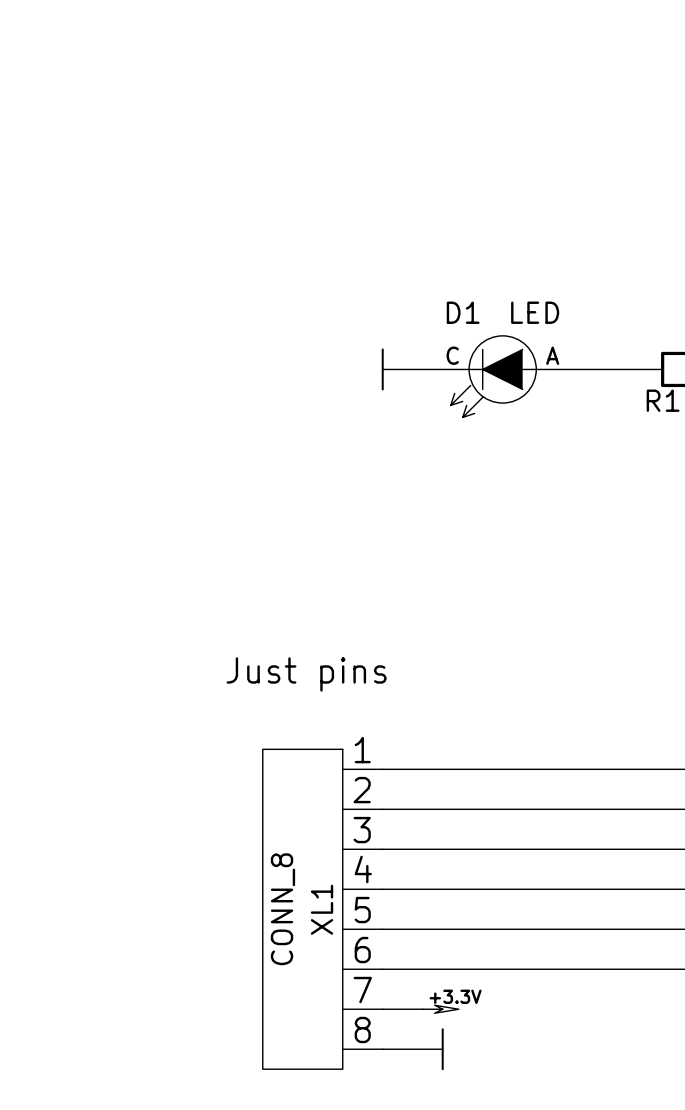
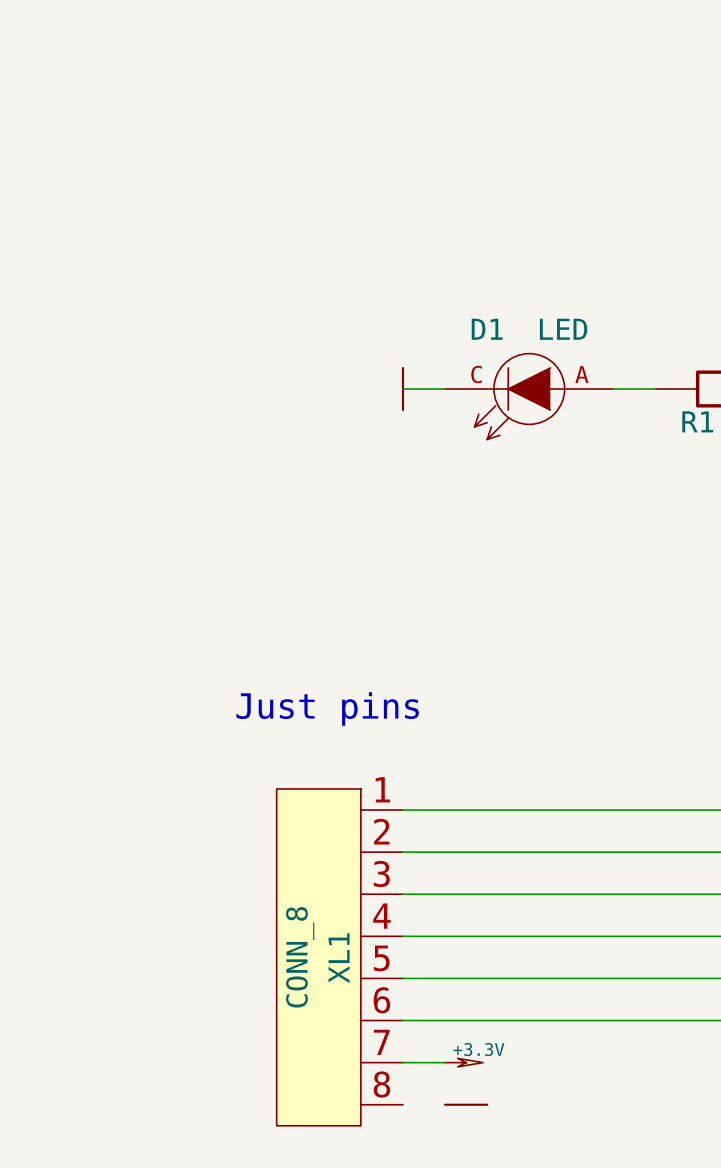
wire: (382, 1049) (442, 1049) -> none
power symbol rotation: 0° (442, 1049) -> 90° clockwise (466, 1104)

